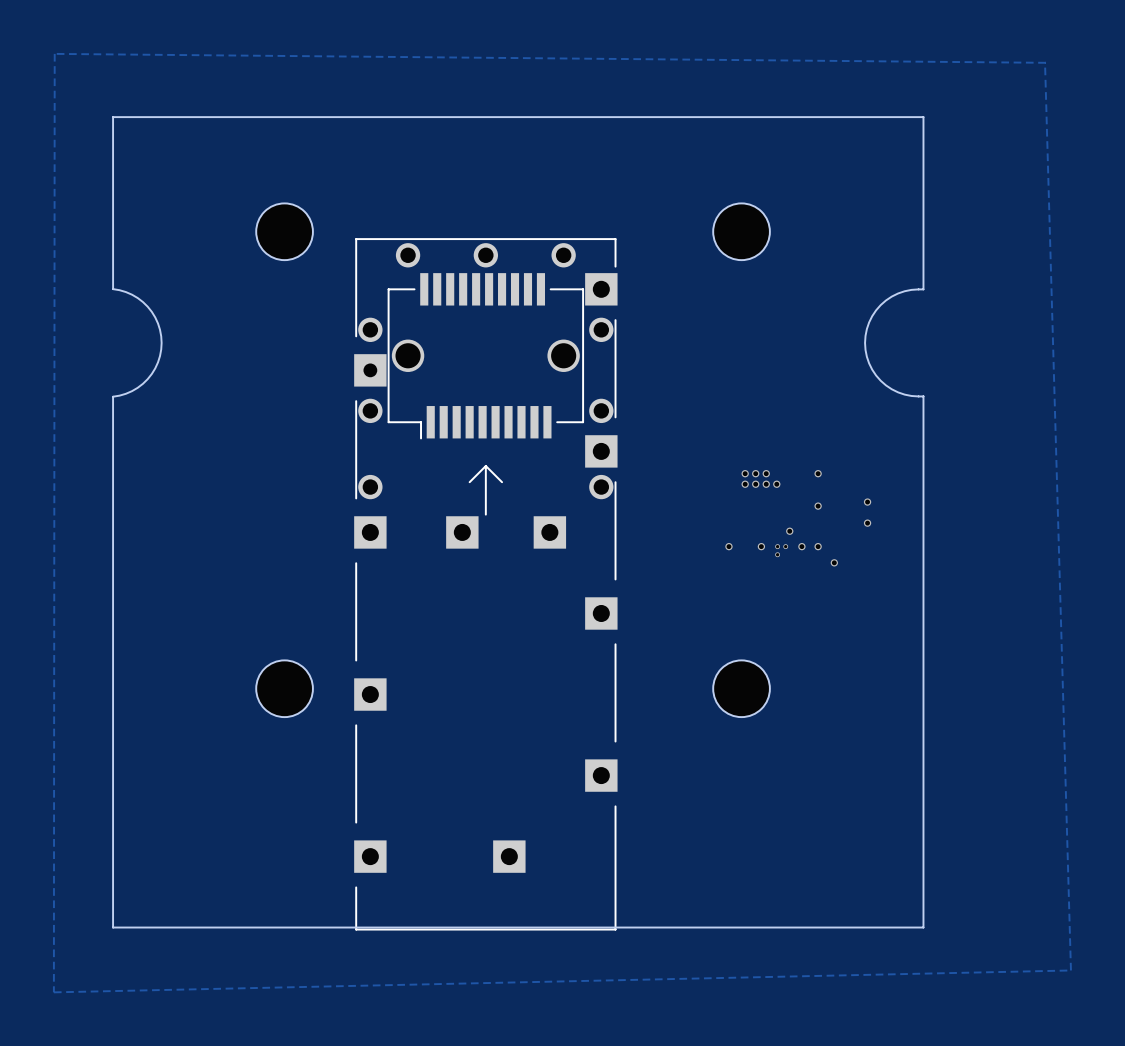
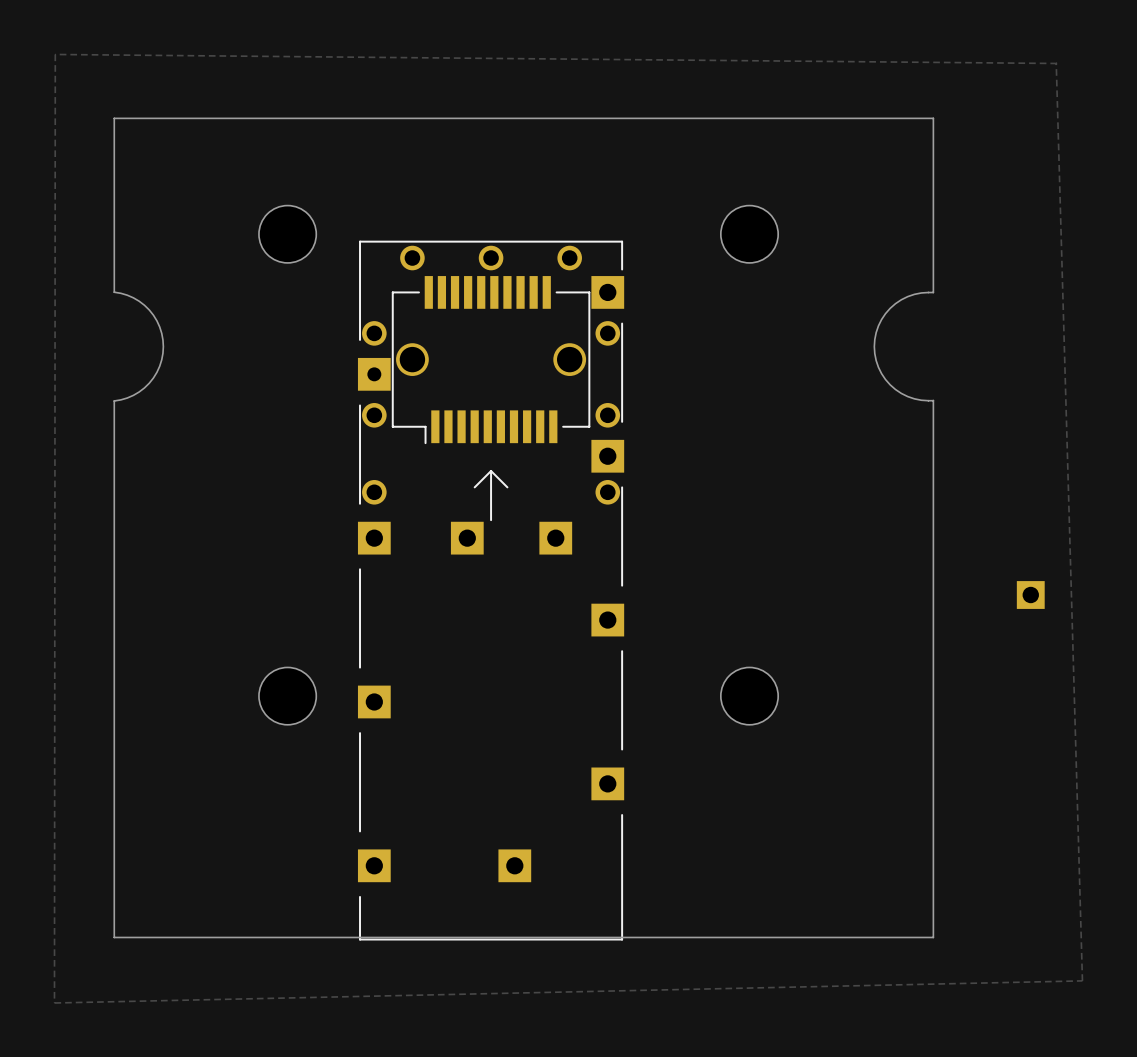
via: (745, 473) -> none
via: (755, 473) -> none
via: (766, 473) -> none
via: (818, 473) -> none
via: (745, 484) -> none
via: (755, 484) -> none
via: (766, 484) -> none
via: (776, 484) -> none
via: (867, 502) -> none
via: (818, 506) -> none
via: (867, 523) -> none
via: (789, 531) -> none
via: (728, 546) -> none
via: (761, 546) -> none
via: (777, 546) -> none
via: (785, 546) -> none
via: (801, 546) -> none
via: (818, 546) -> none
via: (777, 554) -> none
via: (834, 562) -> none
part: none -> (1030, 595)

